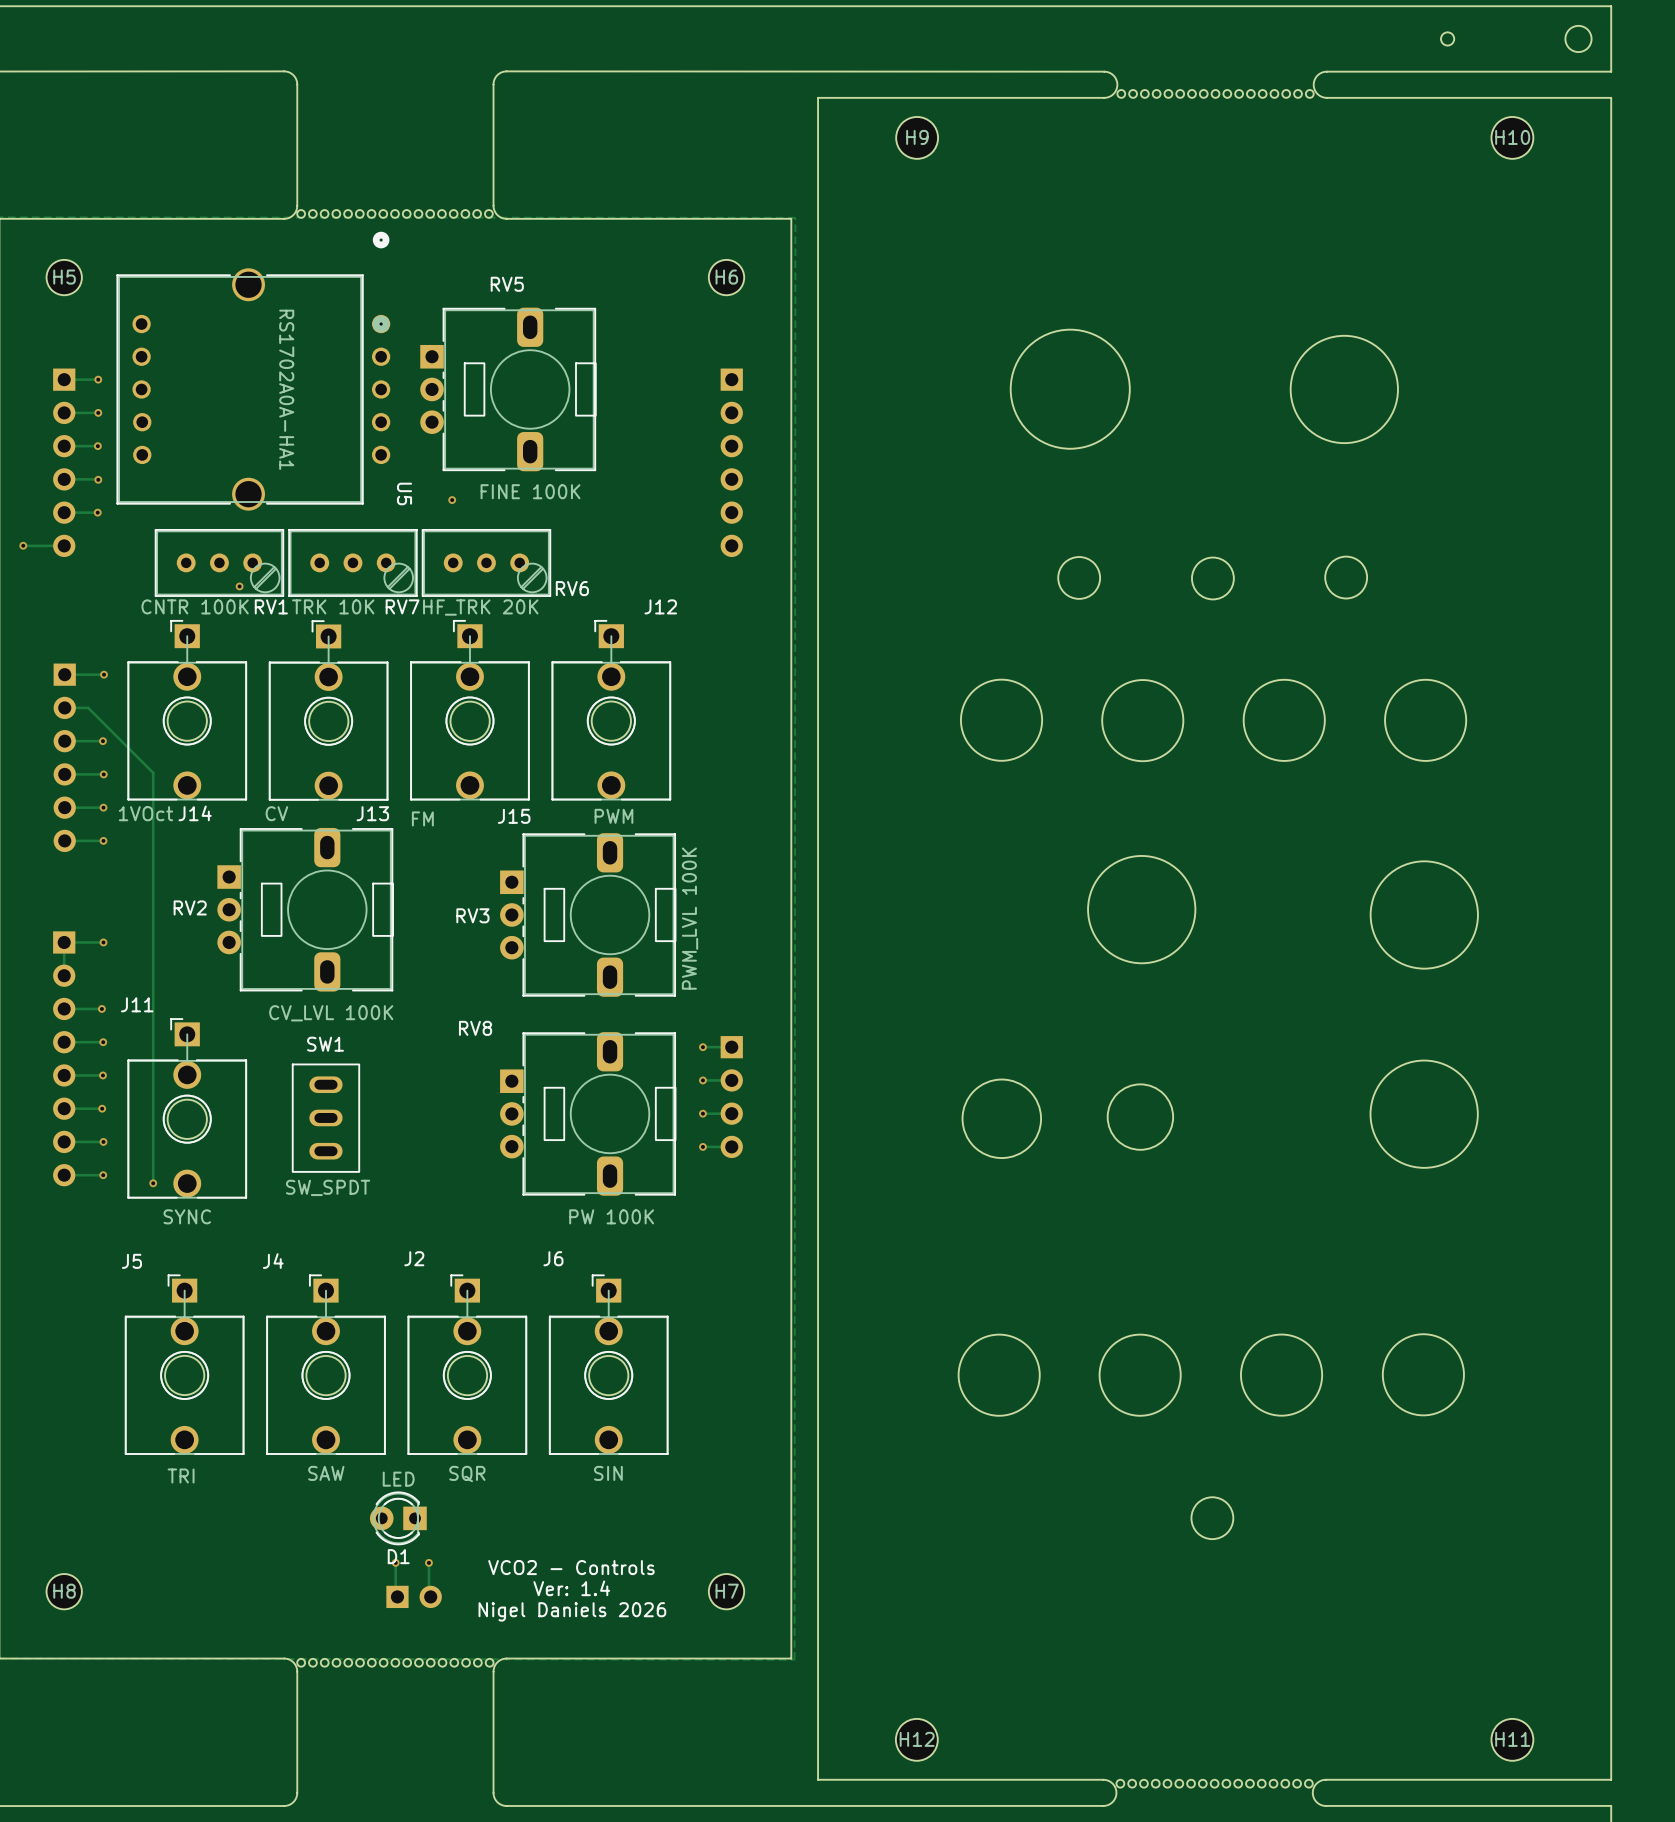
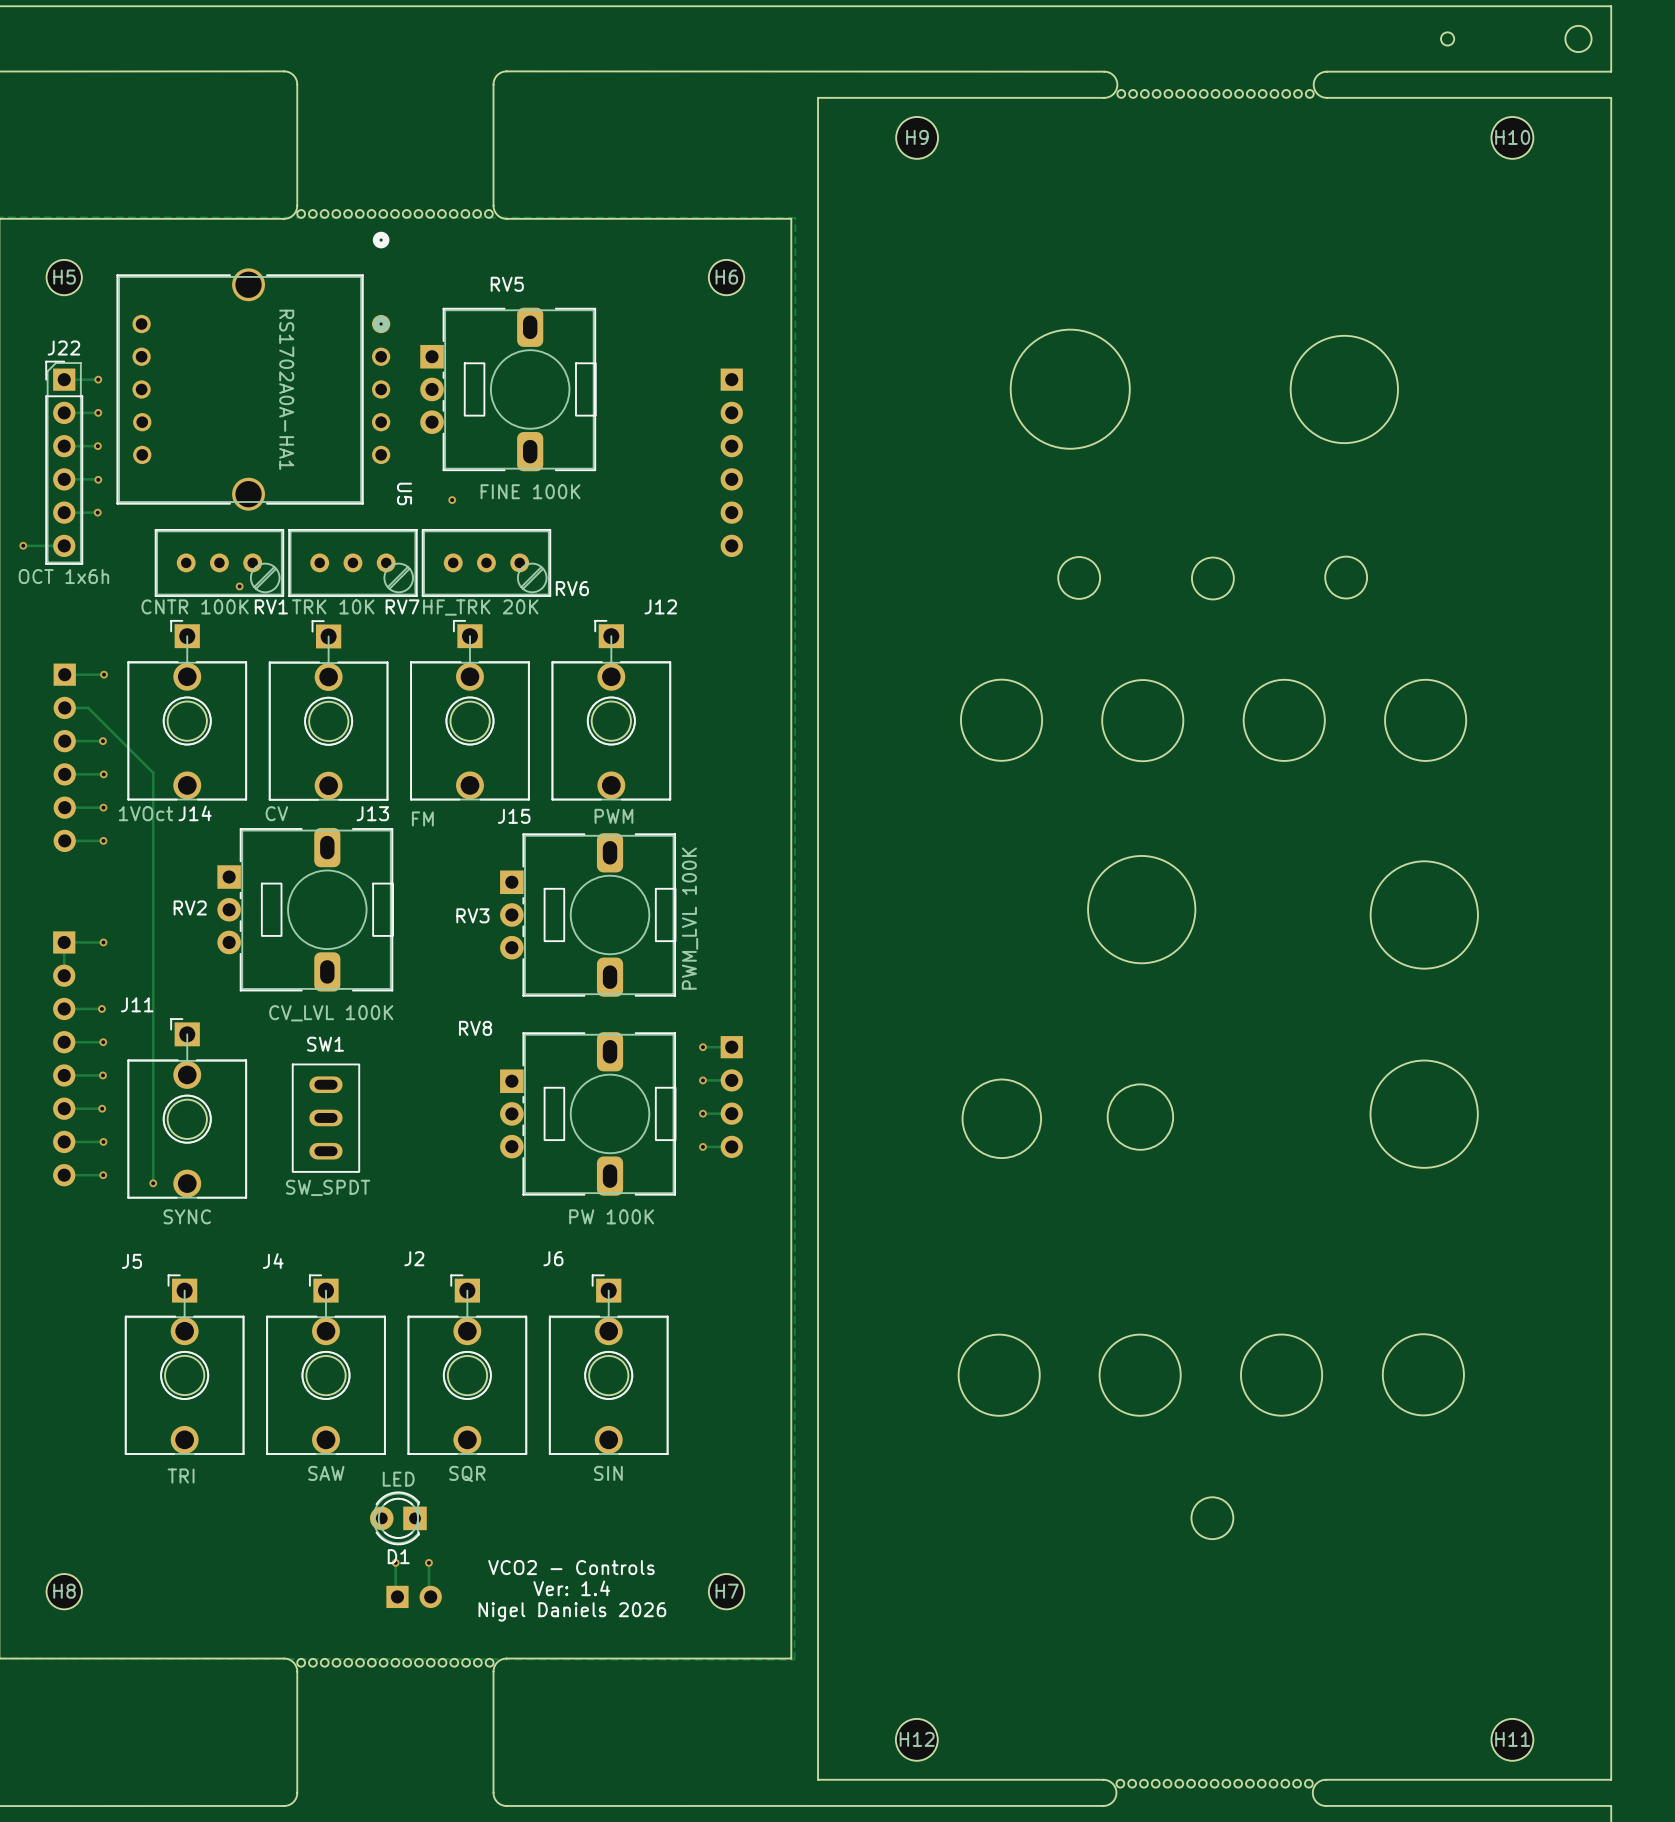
J22 side: bottom (64, 462) -> top (64, 462)

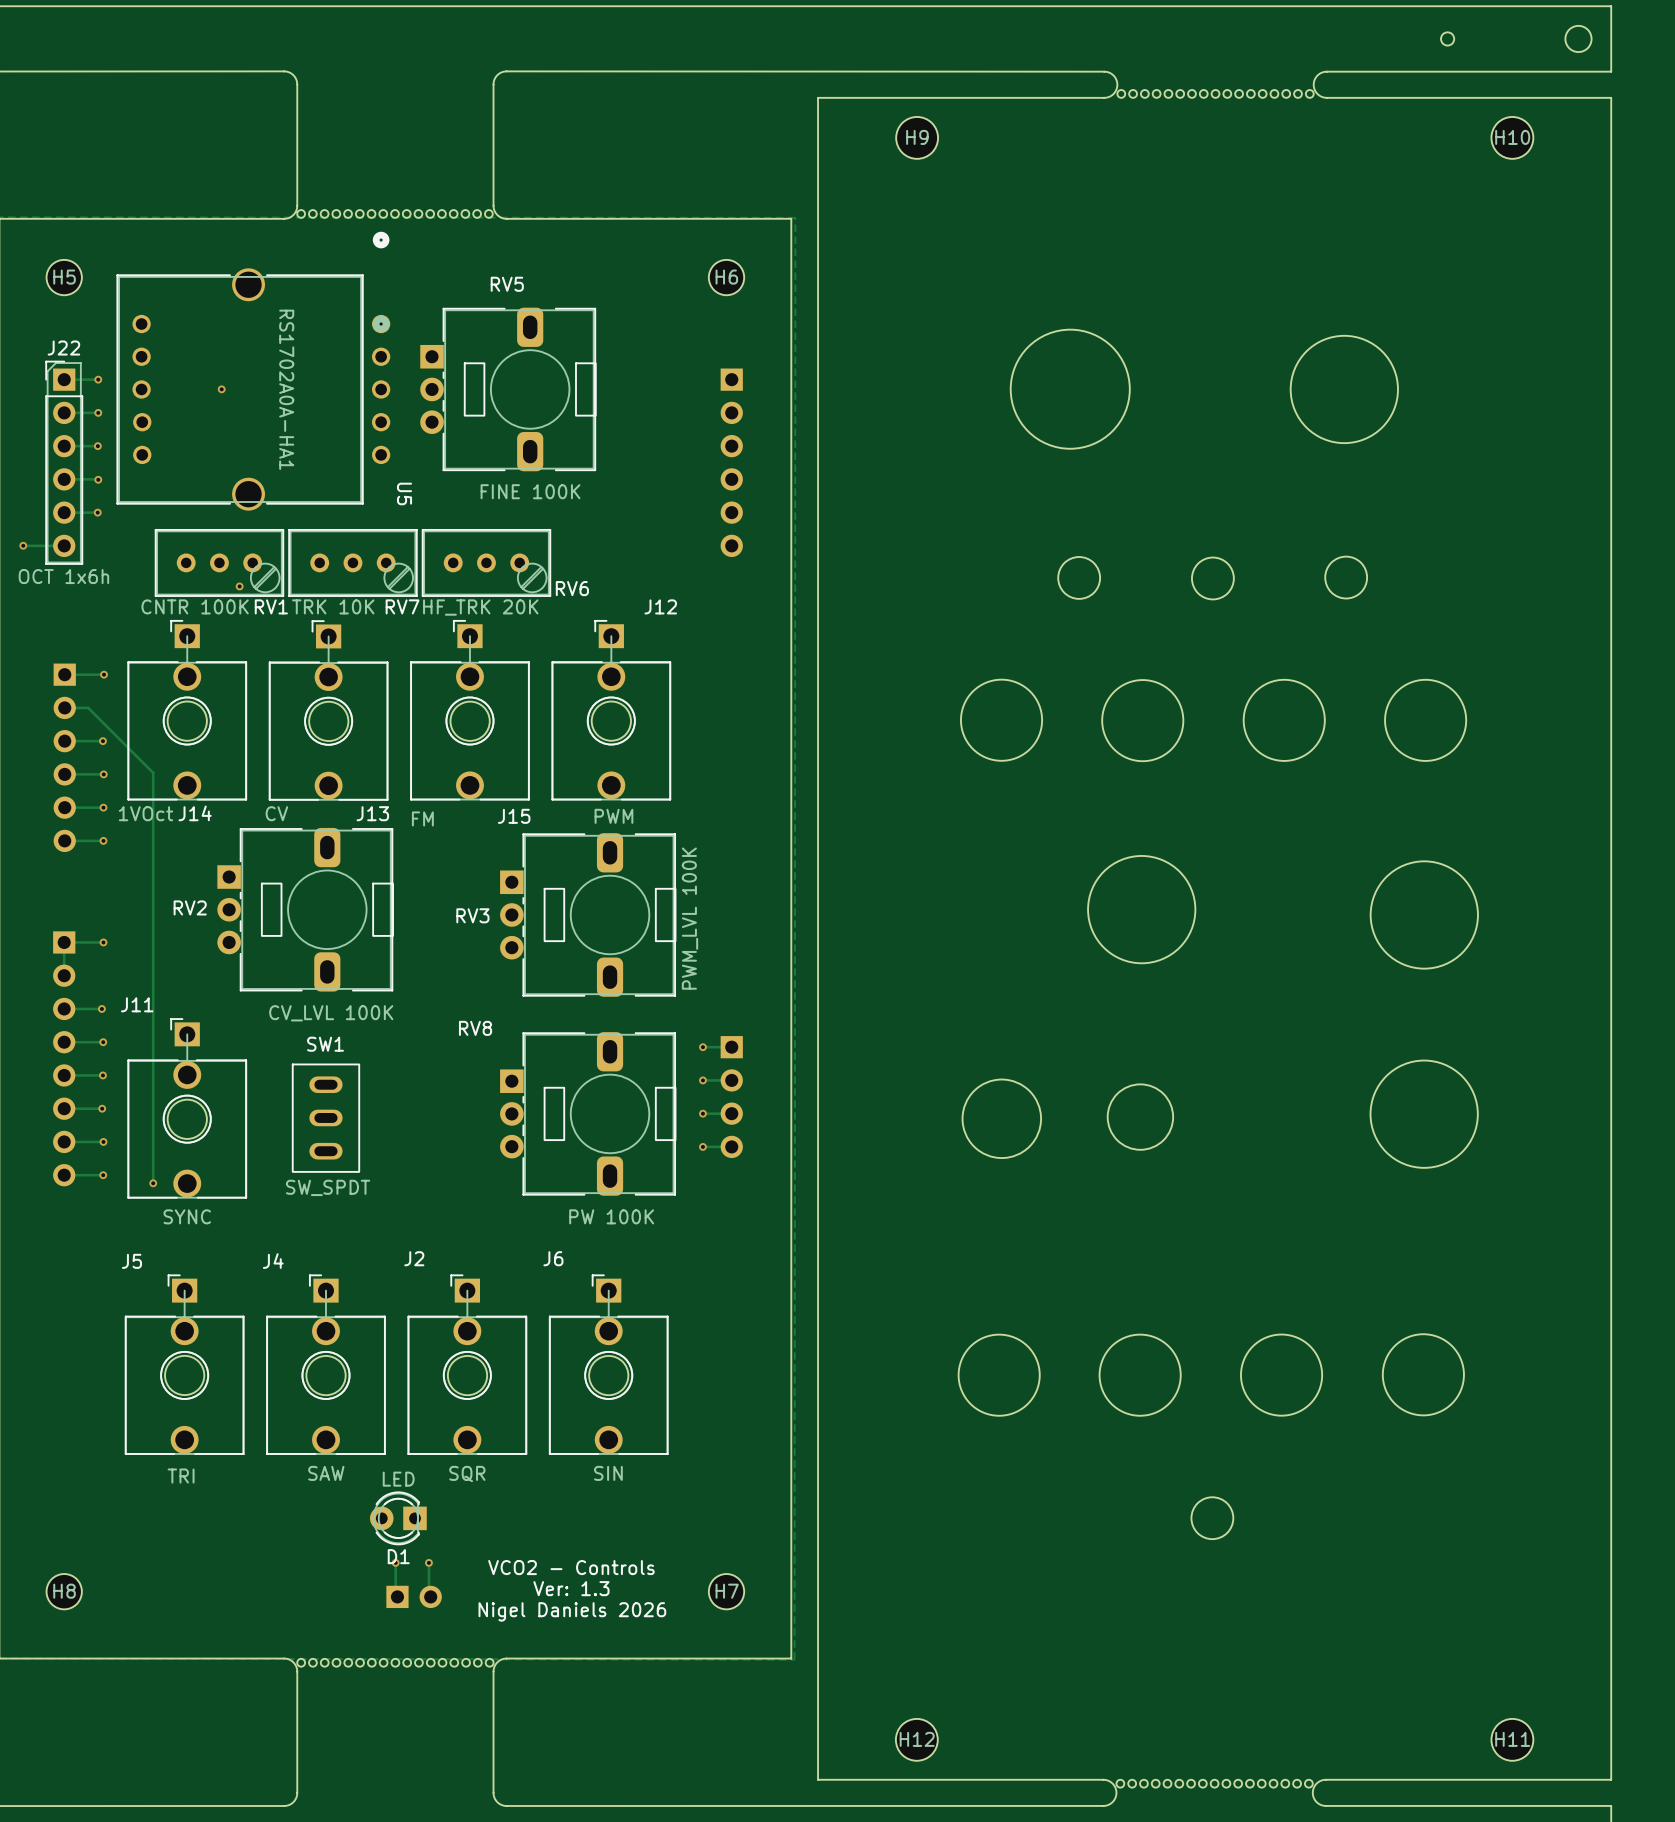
via: none -> (221, 389)
via: (452, 500) -> none
text: Ver: 1.4 (571, 1588) -> Ver: 1.3 (571, 1588)

